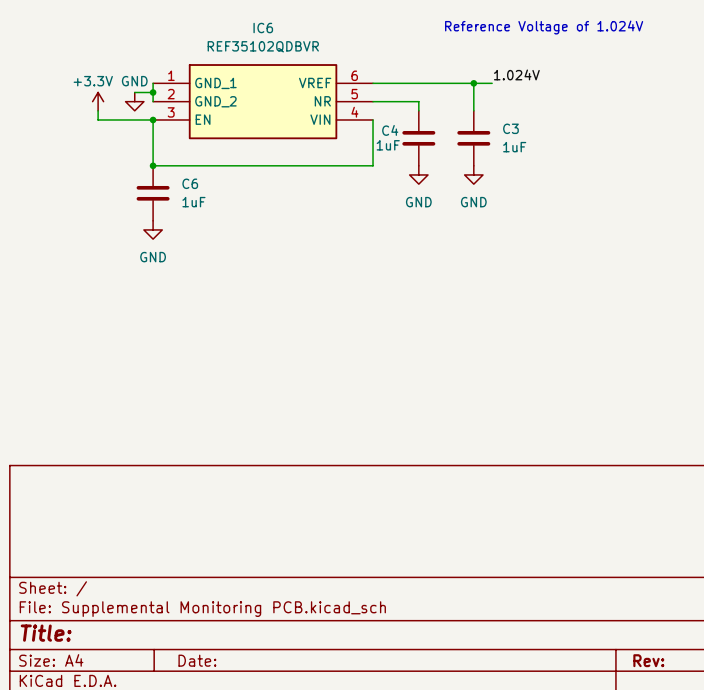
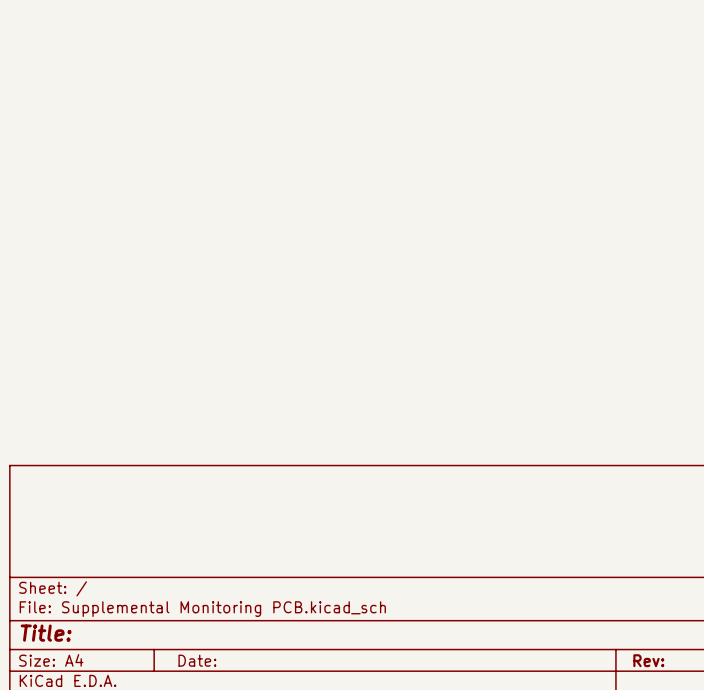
text: Reference Voltage of 1.024V (544, 27) -> none
label: 1.024V (516, 74) -> none
wire: (153, 83) (153, 101) -> none
wire: (373, 83) (492, 83) -> none
wire: (473, 83) (473, 110) -> none
junction: (473, 83) -> none
wire: (134, 92) (153, 92) -> none
junction: (153, 92) -> none
power symbol: +3.3V (98, 101) -> none
power symbol: GND (134, 101) -> none
IC6: REF35102QDBVR (263, 101) -> none
wire: (373, 101) (418, 101) (418, 110) -> none
wire: (98, 110) (98, 119) (153, 119) (153, 165) (373, 165) (373, 119) -> none
junction: (153, 119) -> none
C4: 1uF (418, 138) -> none
C3: 1uF (473, 138) -> none
junction: (153, 165) -> none
power symbol: GND (418, 174) -> none
power symbol: GND (473, 174) -> none
C6: 1uF (153, 193) -> none
power symbol: GND (153, 229) -> none

